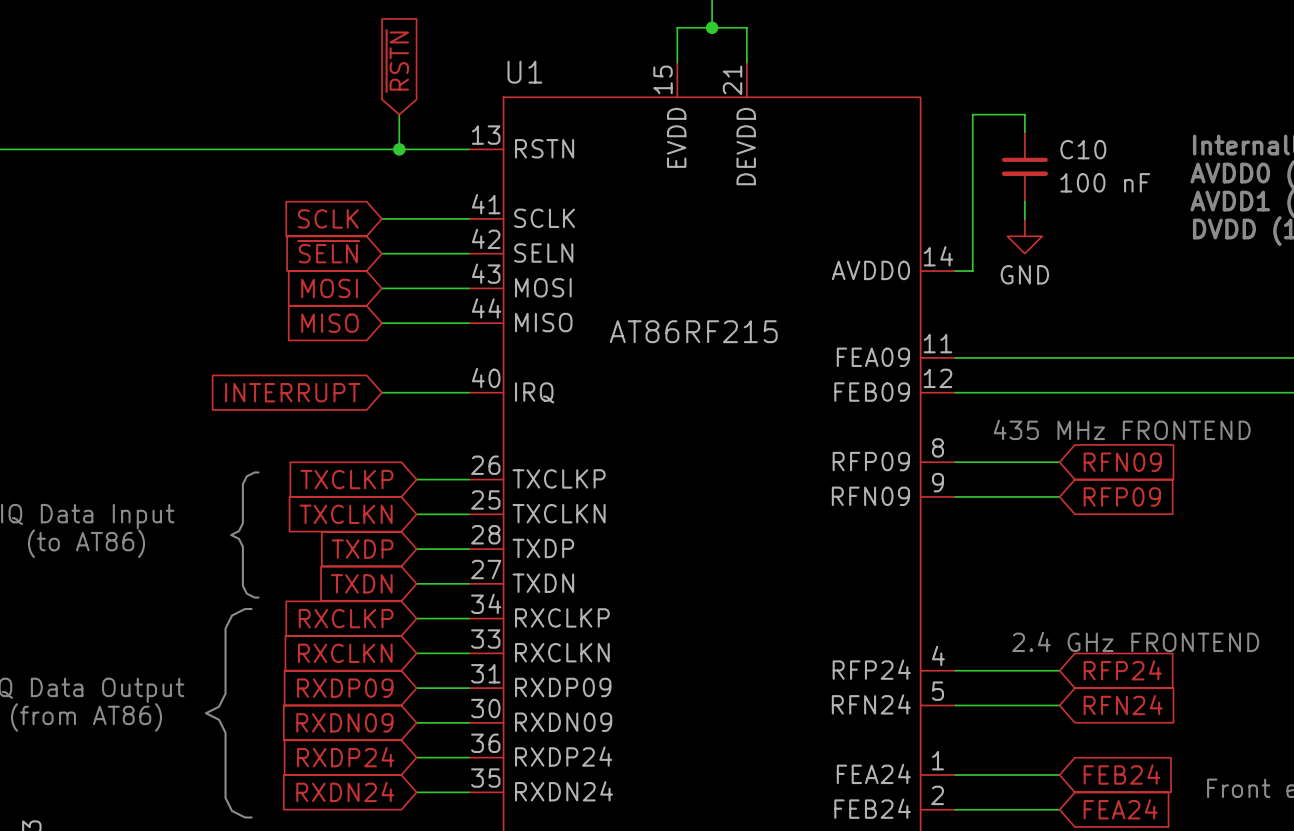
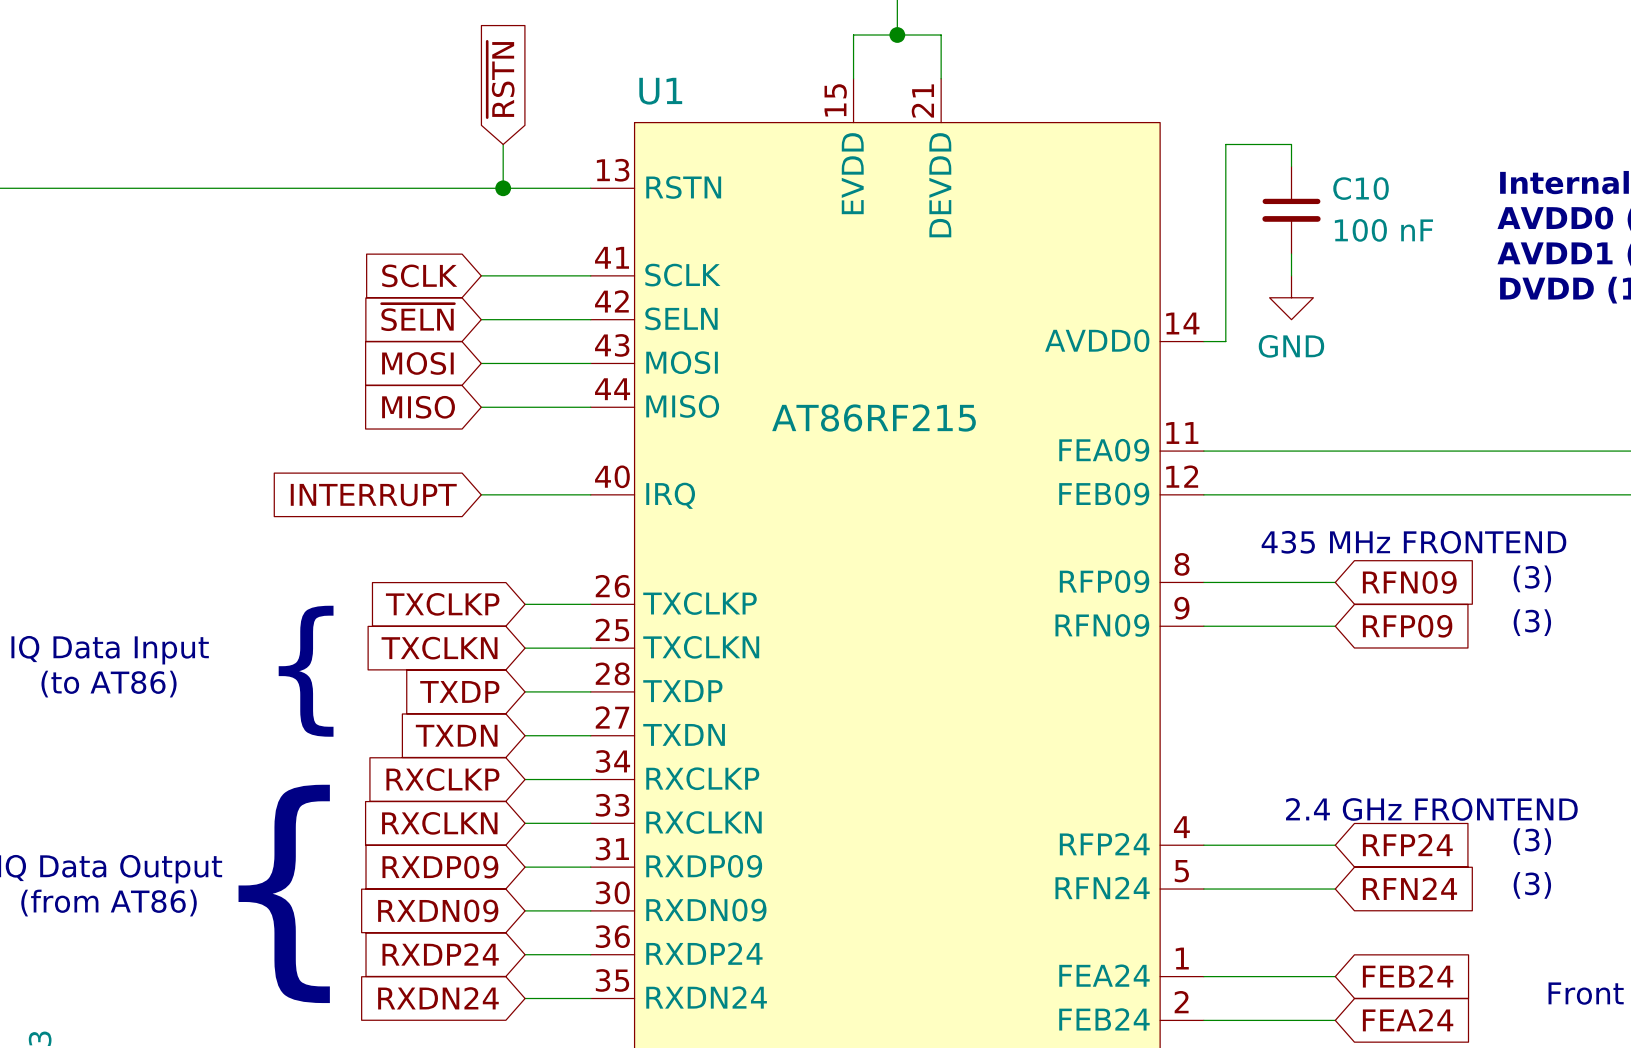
text: none -> (3) (1532, 578)
text: none -> (3) (1532, 622)
text: none -> (3) (1532, 841)
text: none -> (3) (1532, 885)

